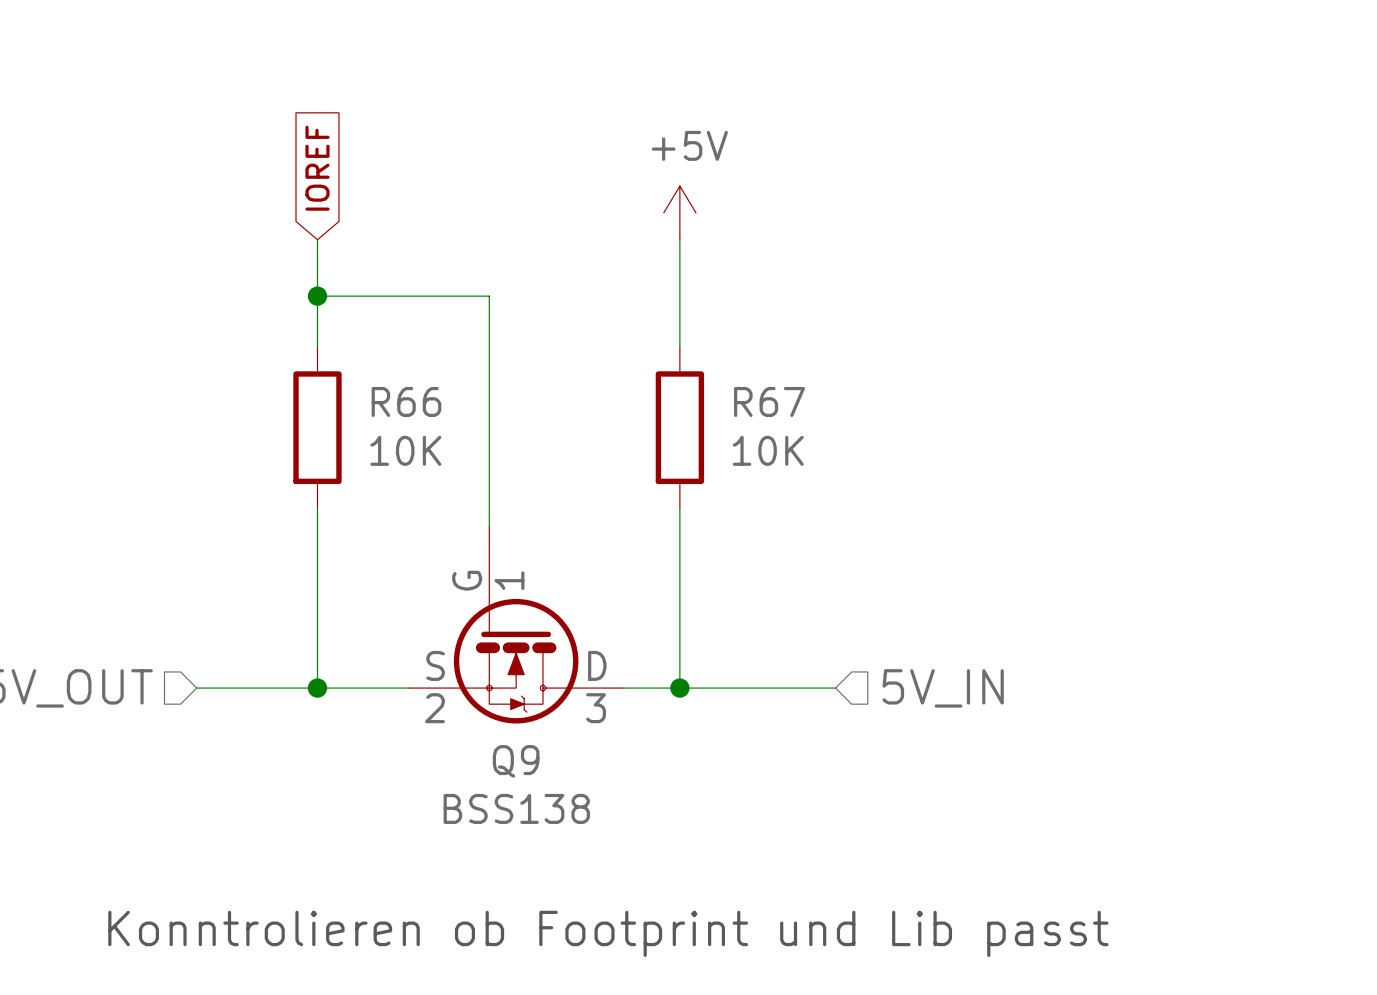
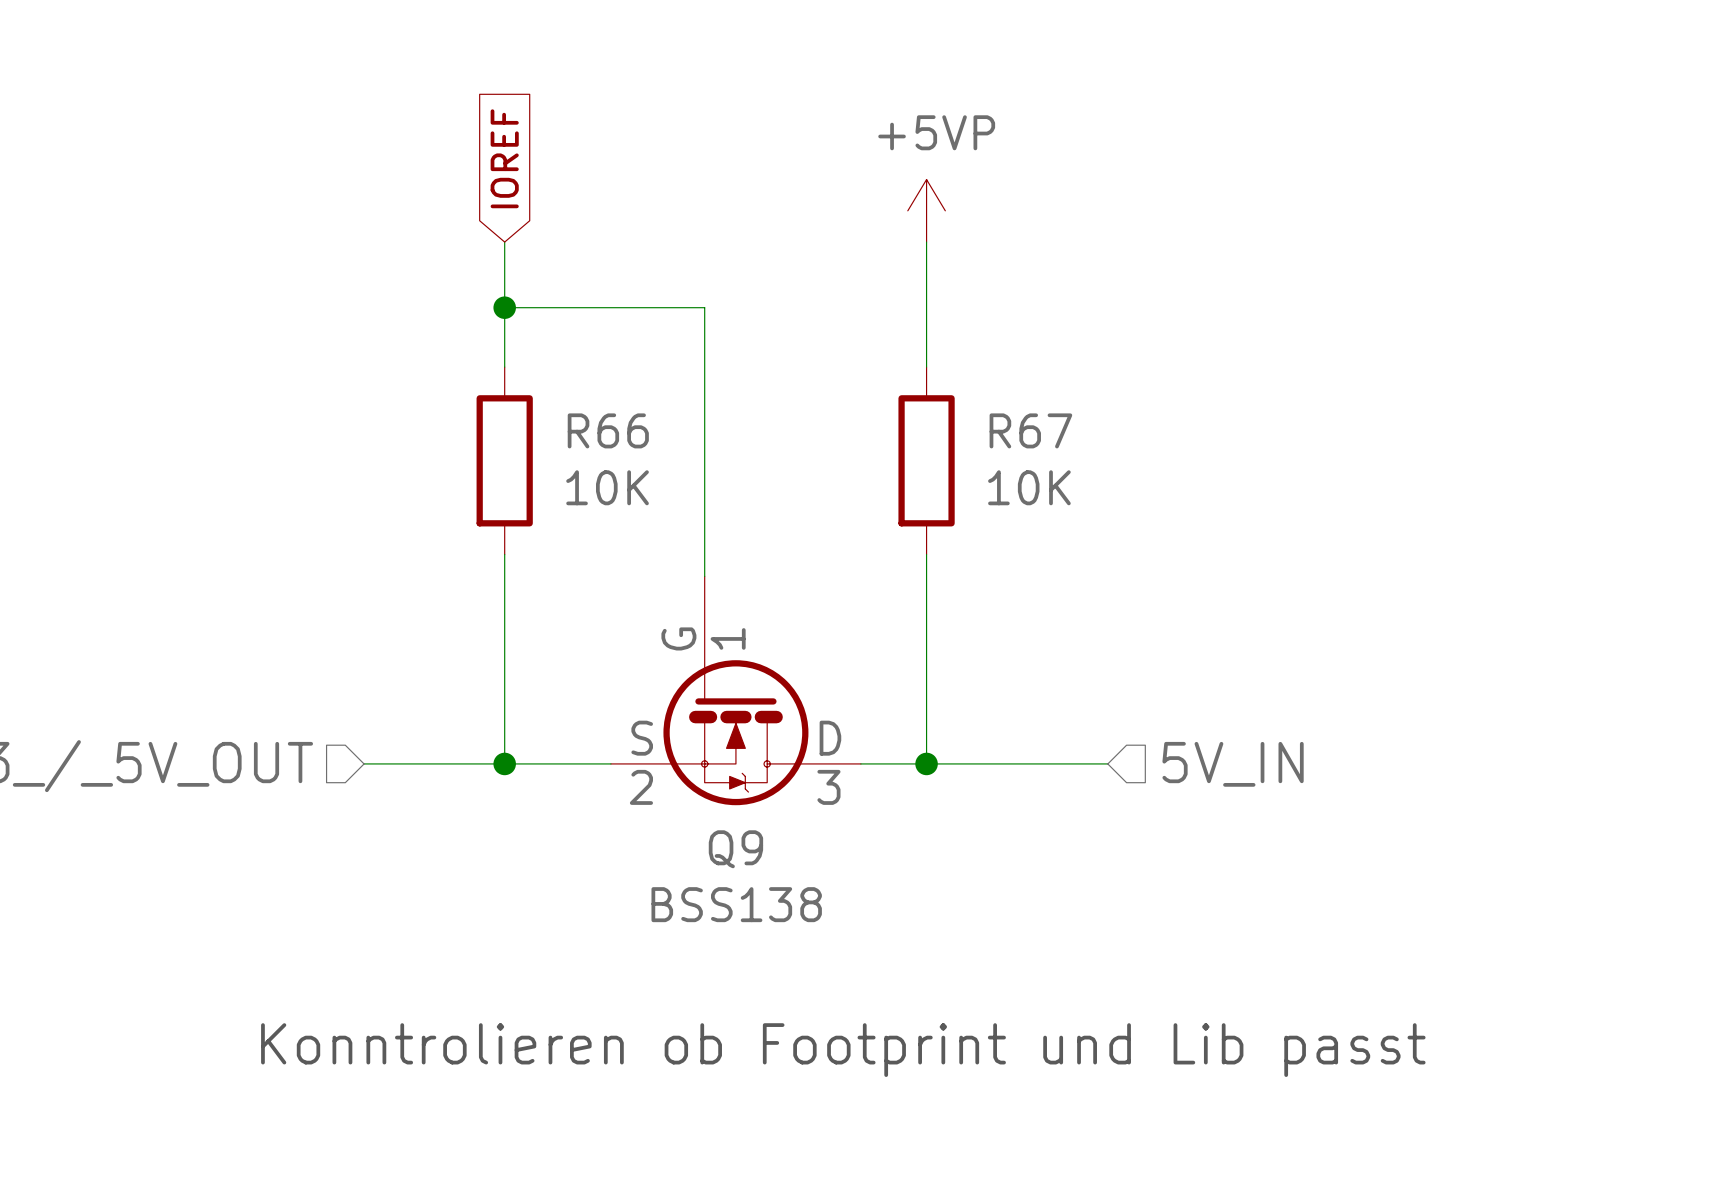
power symbol: +5V (679, 212) -> +5VP (926, 210)

